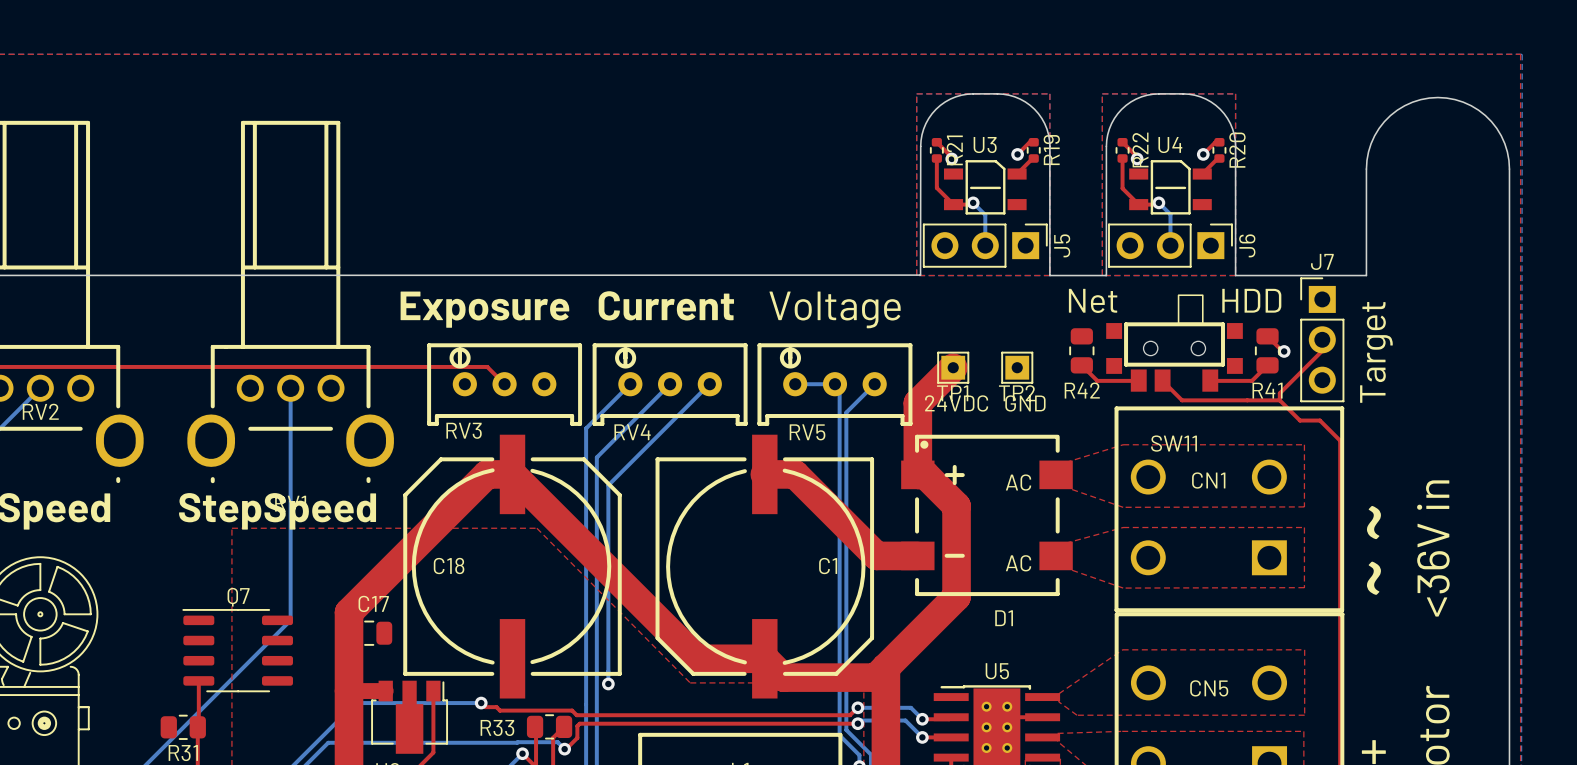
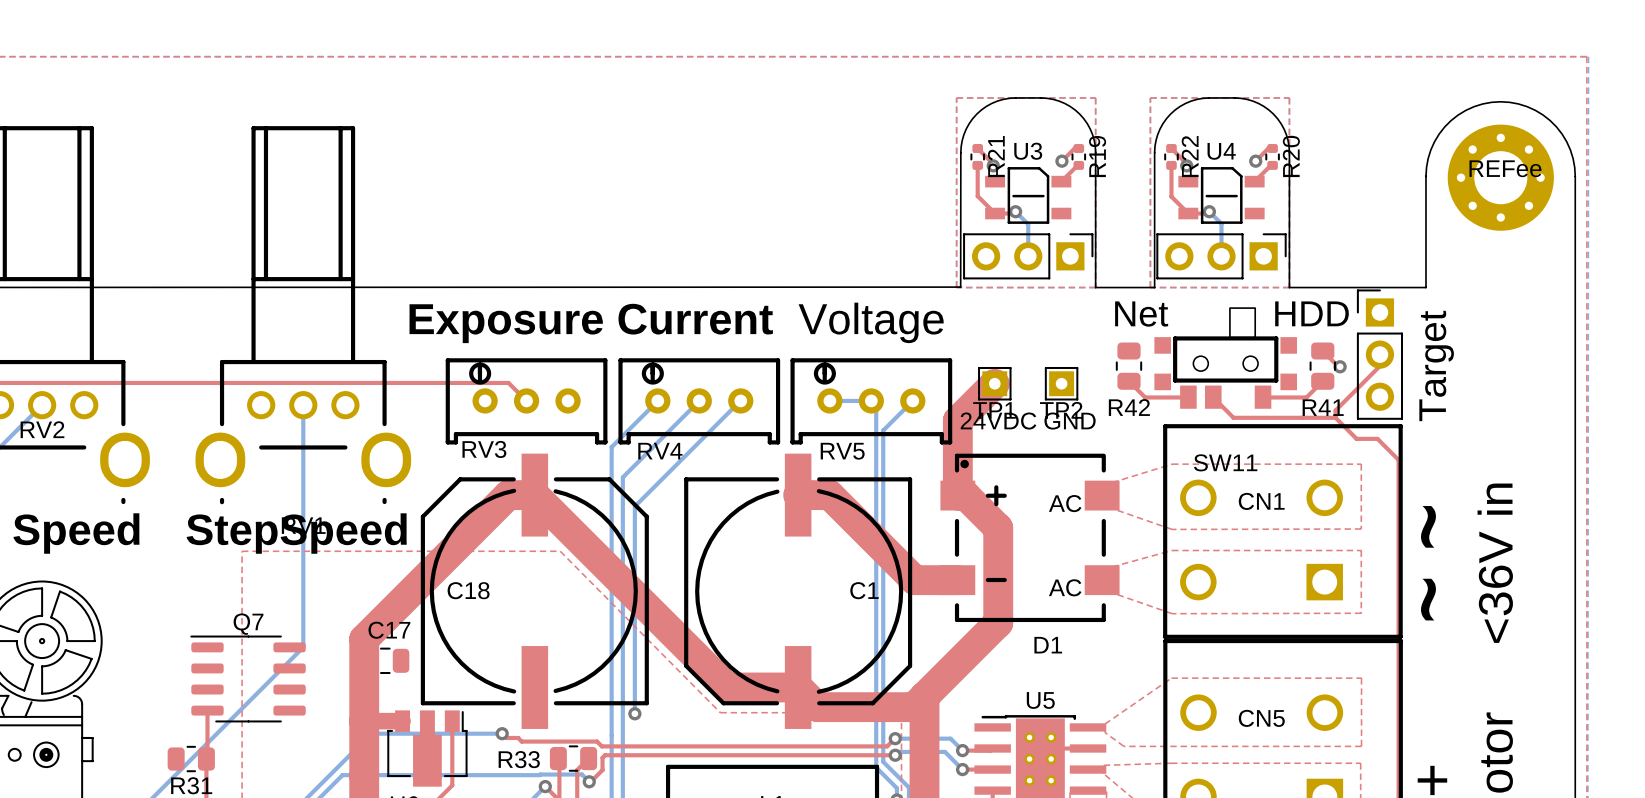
REFee: none -> (1500, 177)
J5 name: J5 (1062, 245) -> none
J6 name: J6 (1247, 245) -> none
J7 name: J7 (1322, 261) -> none

